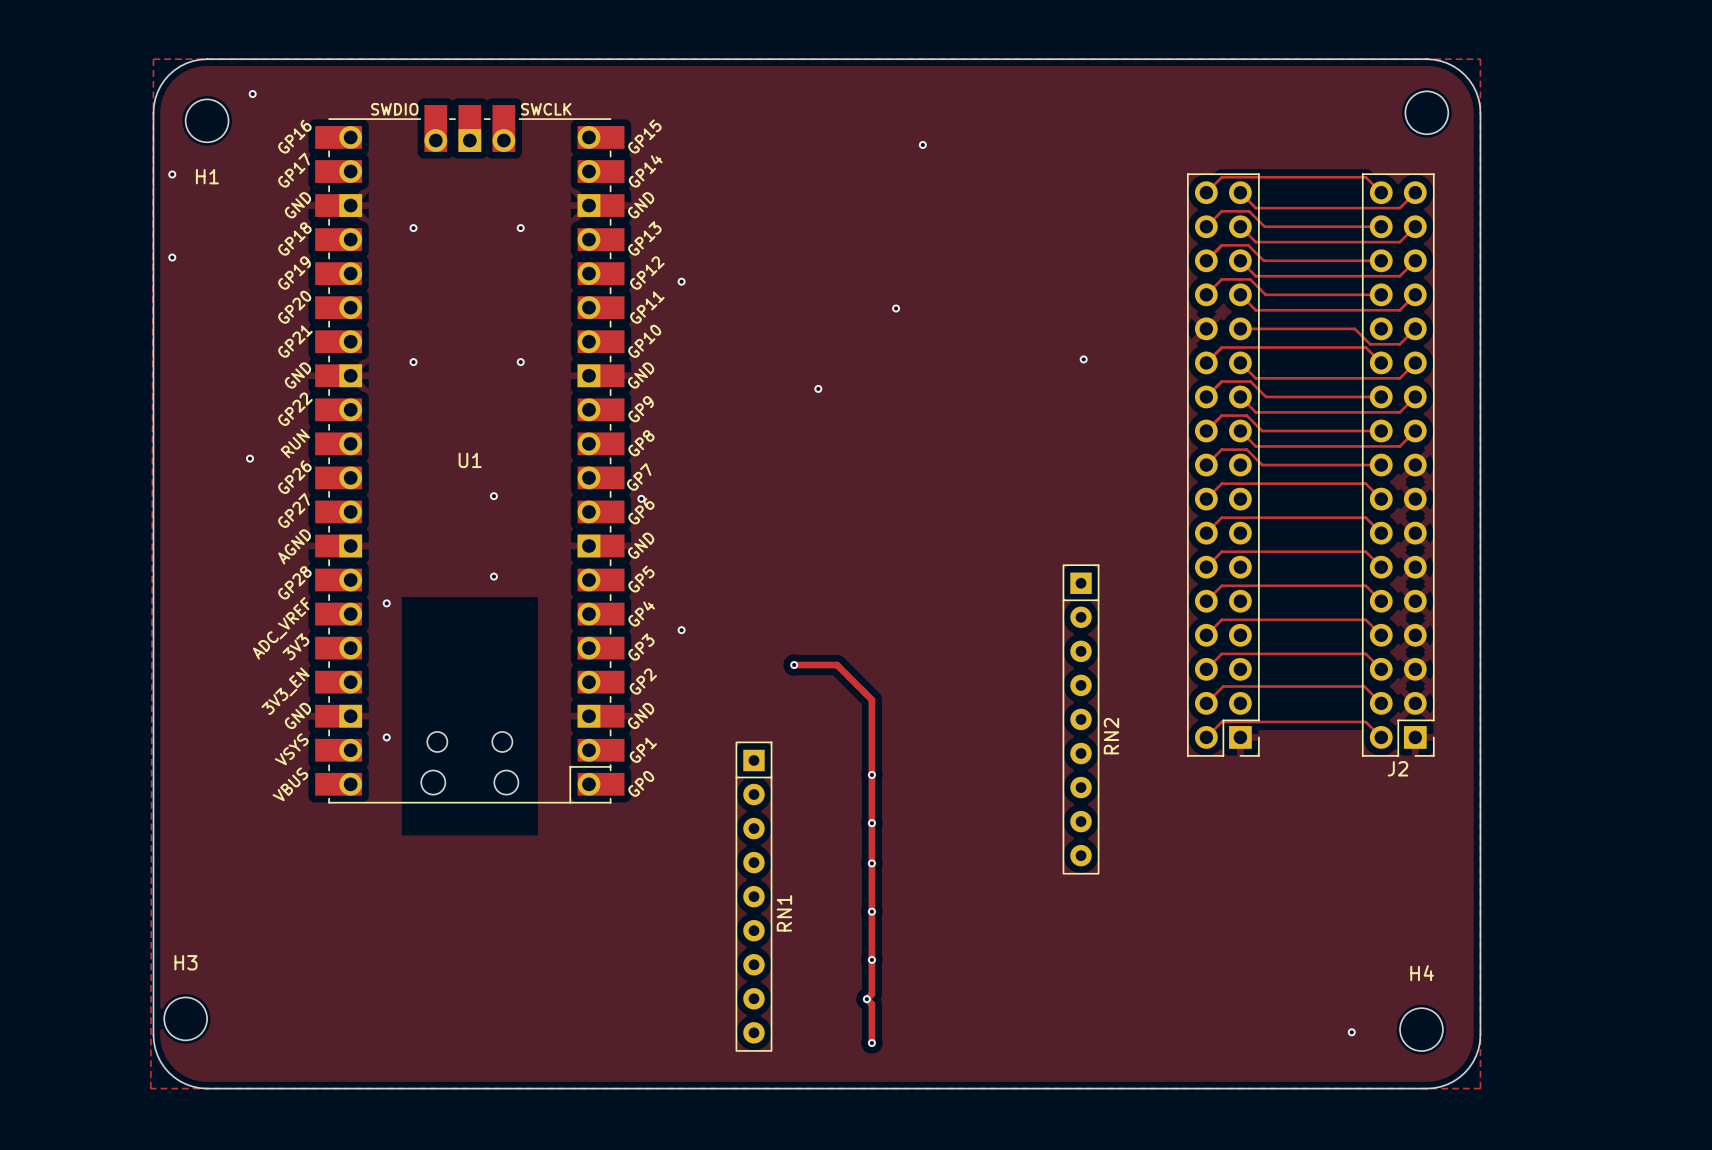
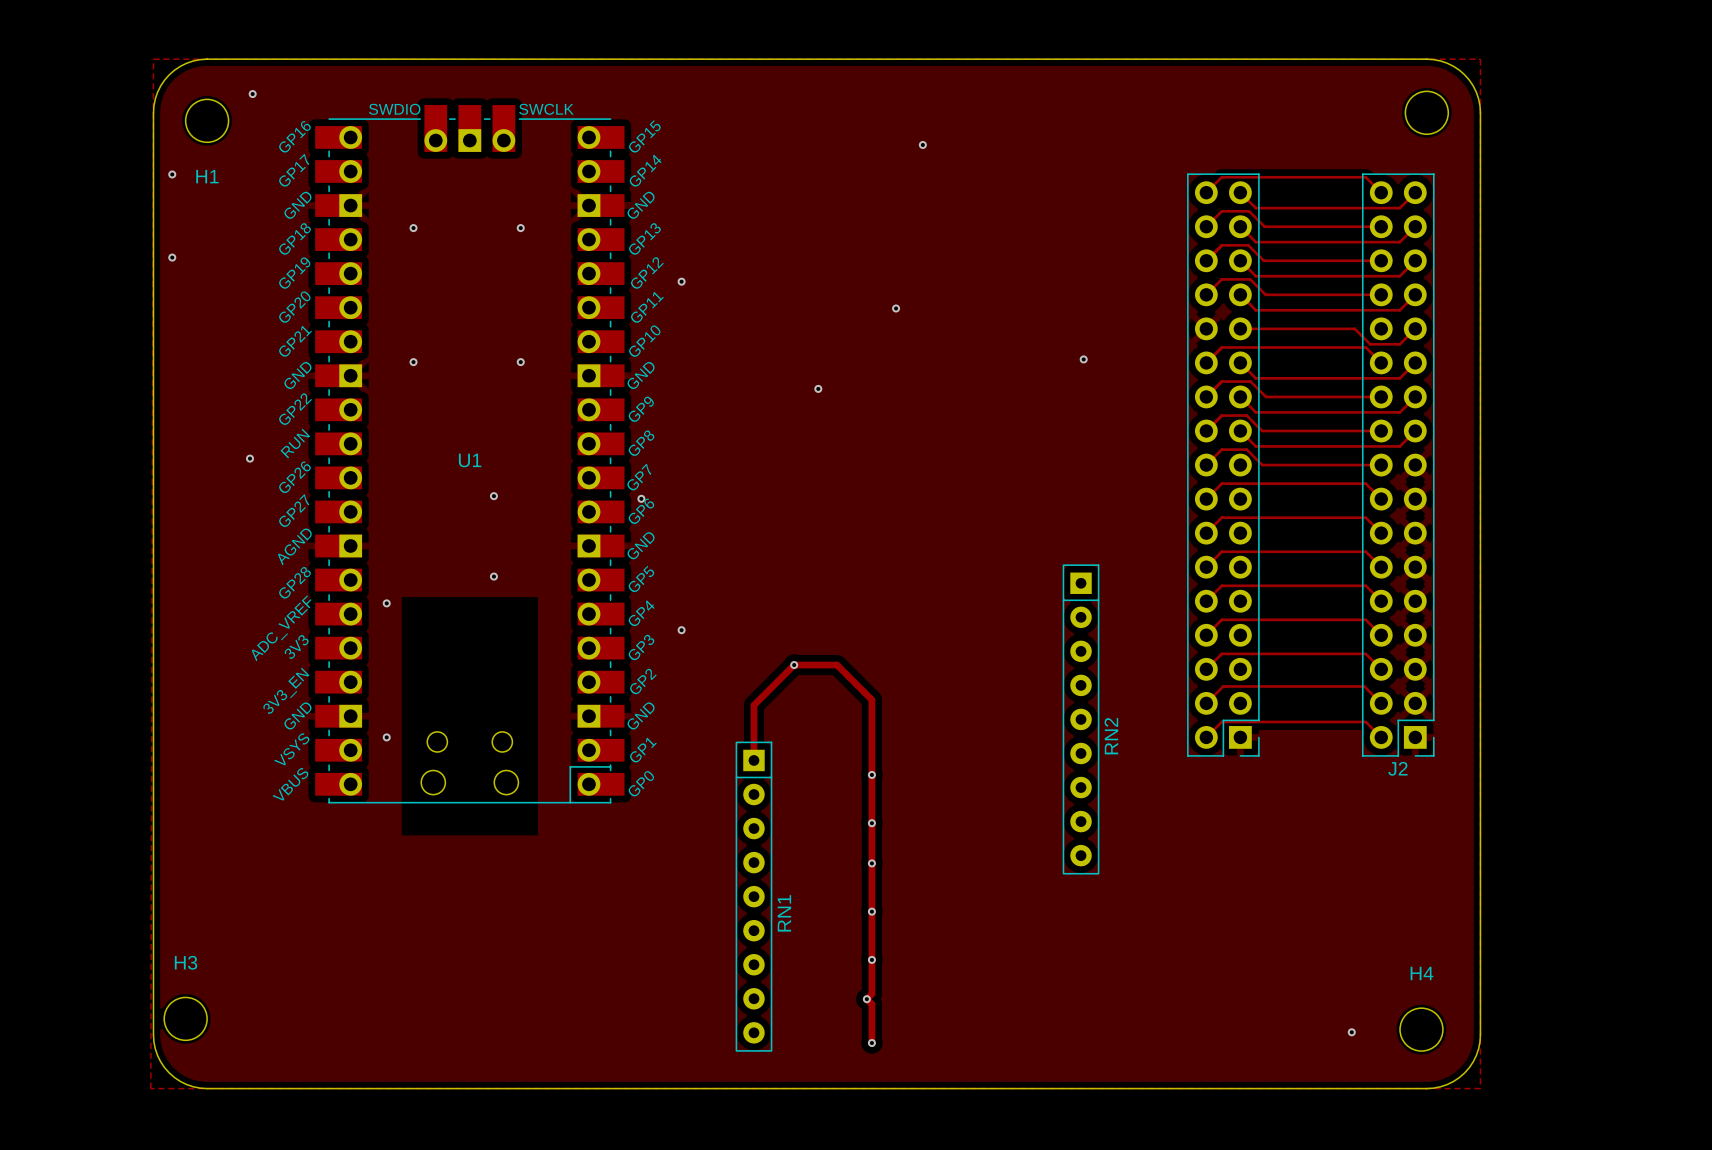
track: none -> (794, 665) (753, 705) (753, 760)

